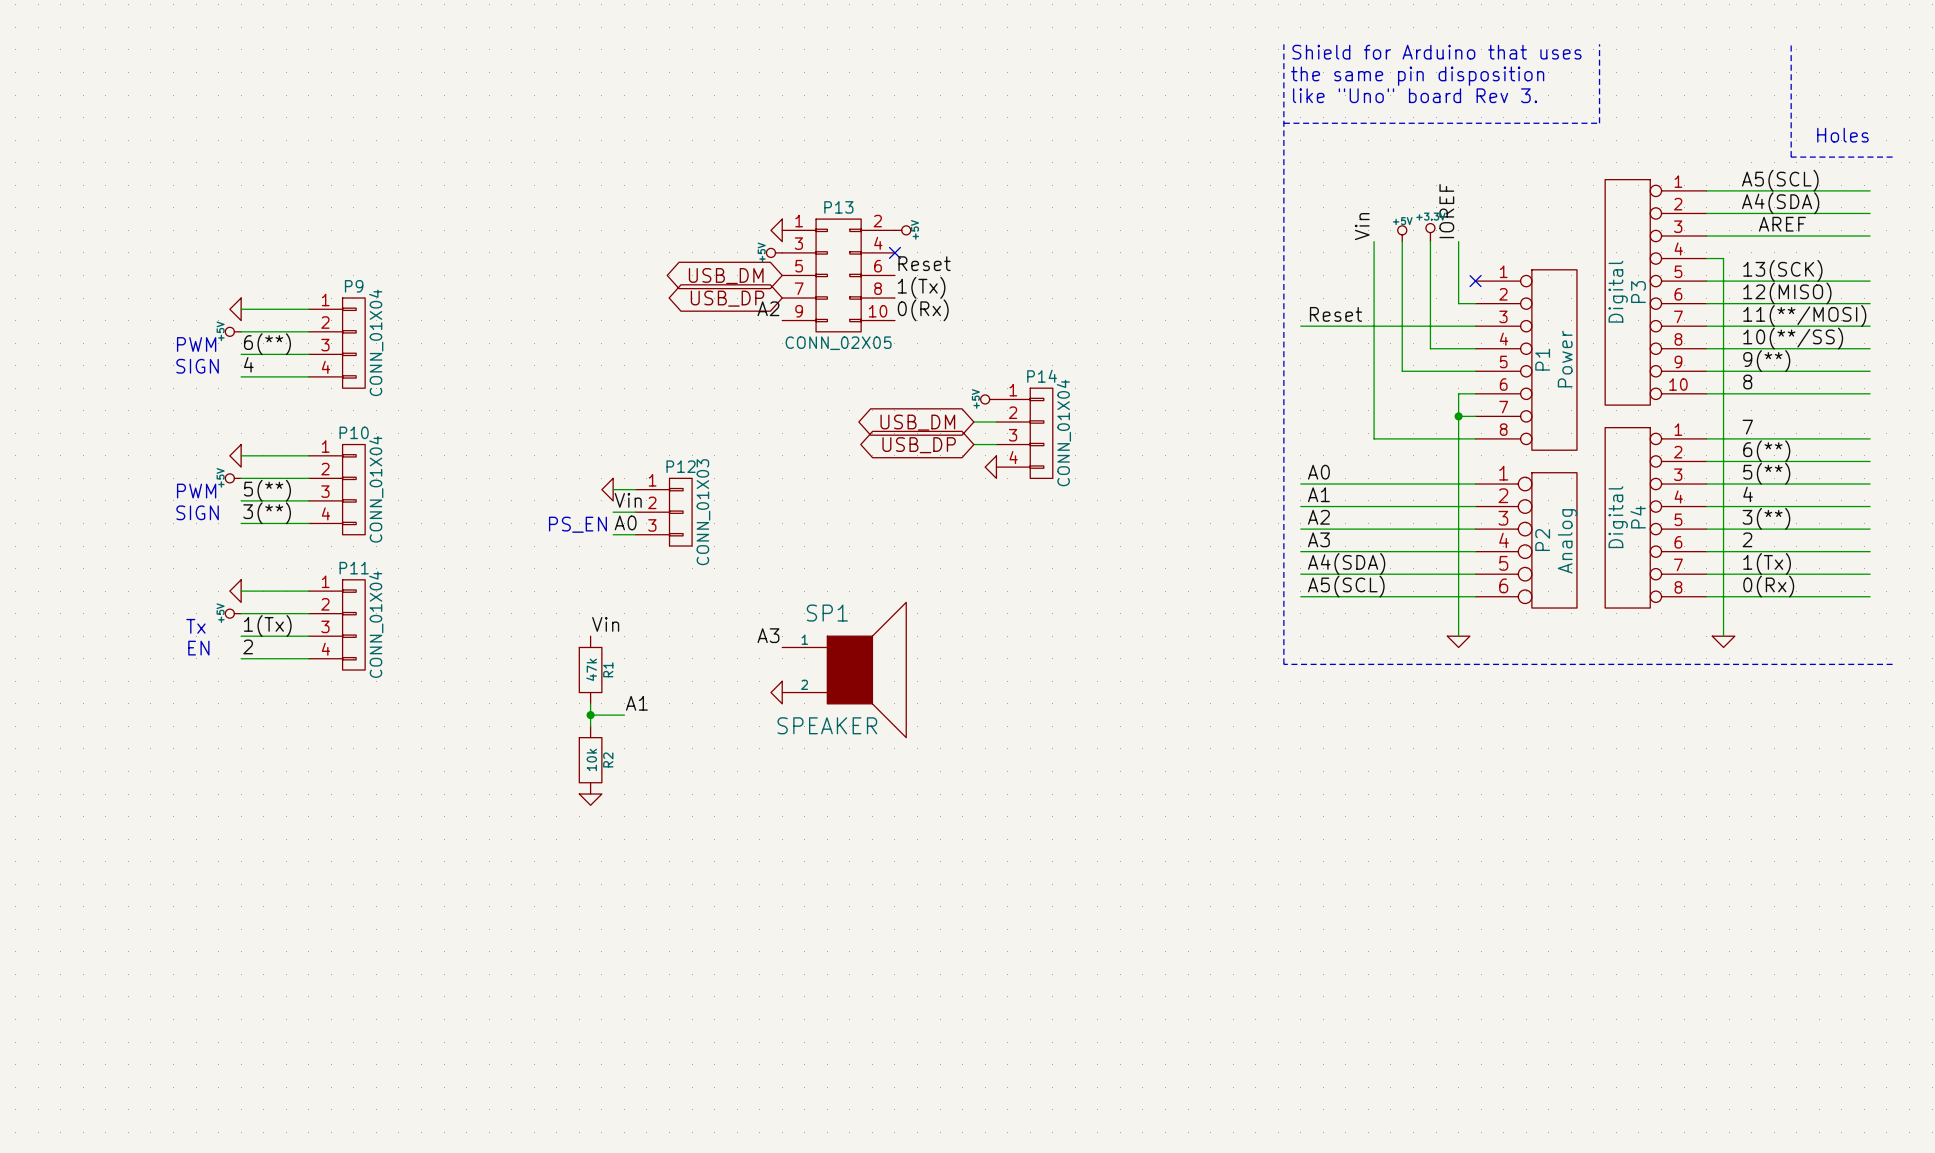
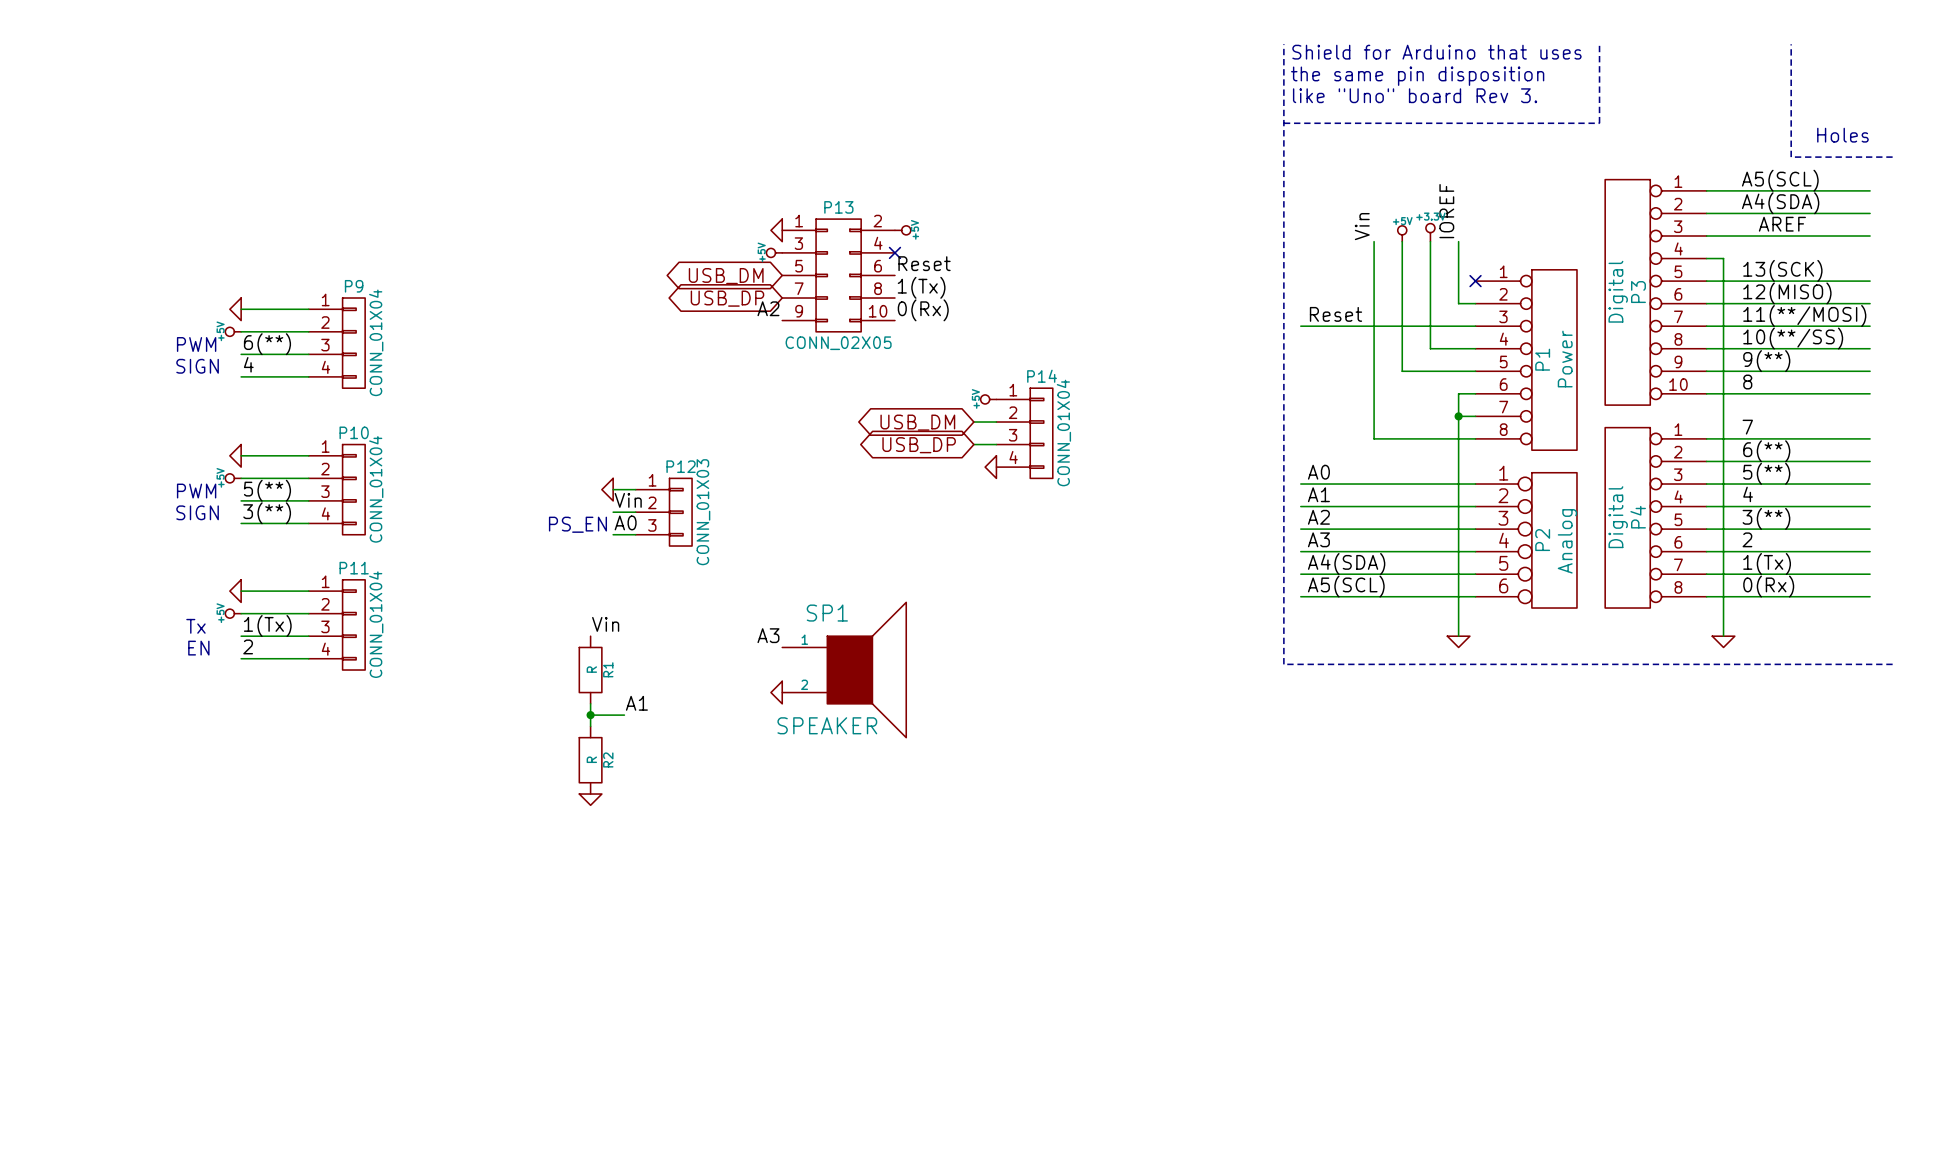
R1 value: 47k (591, 669) -> R (591, 669)
R2 value: 10k (591, 759) -> R (591, 759)

